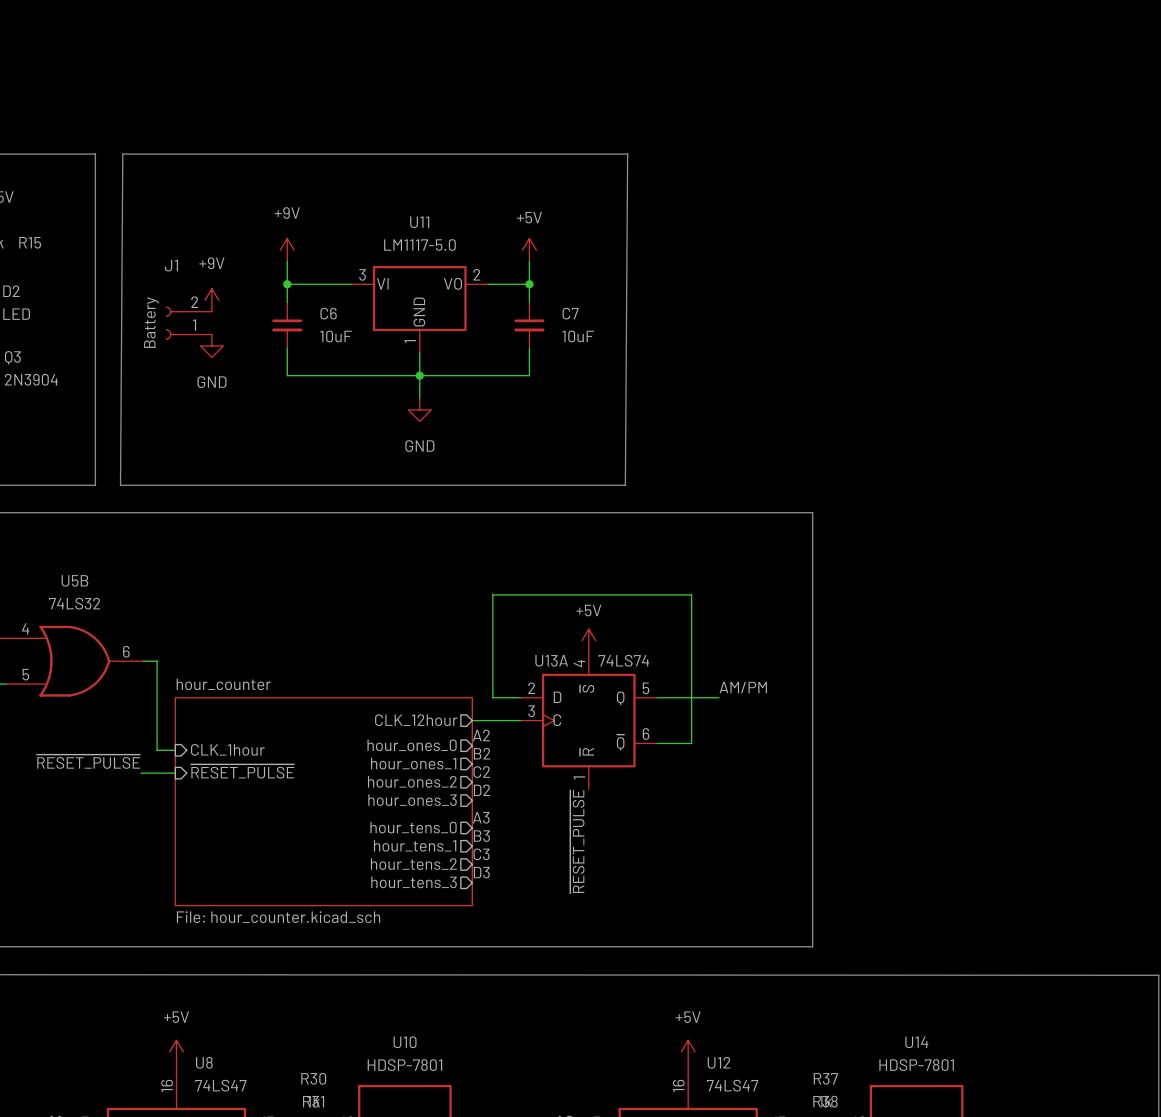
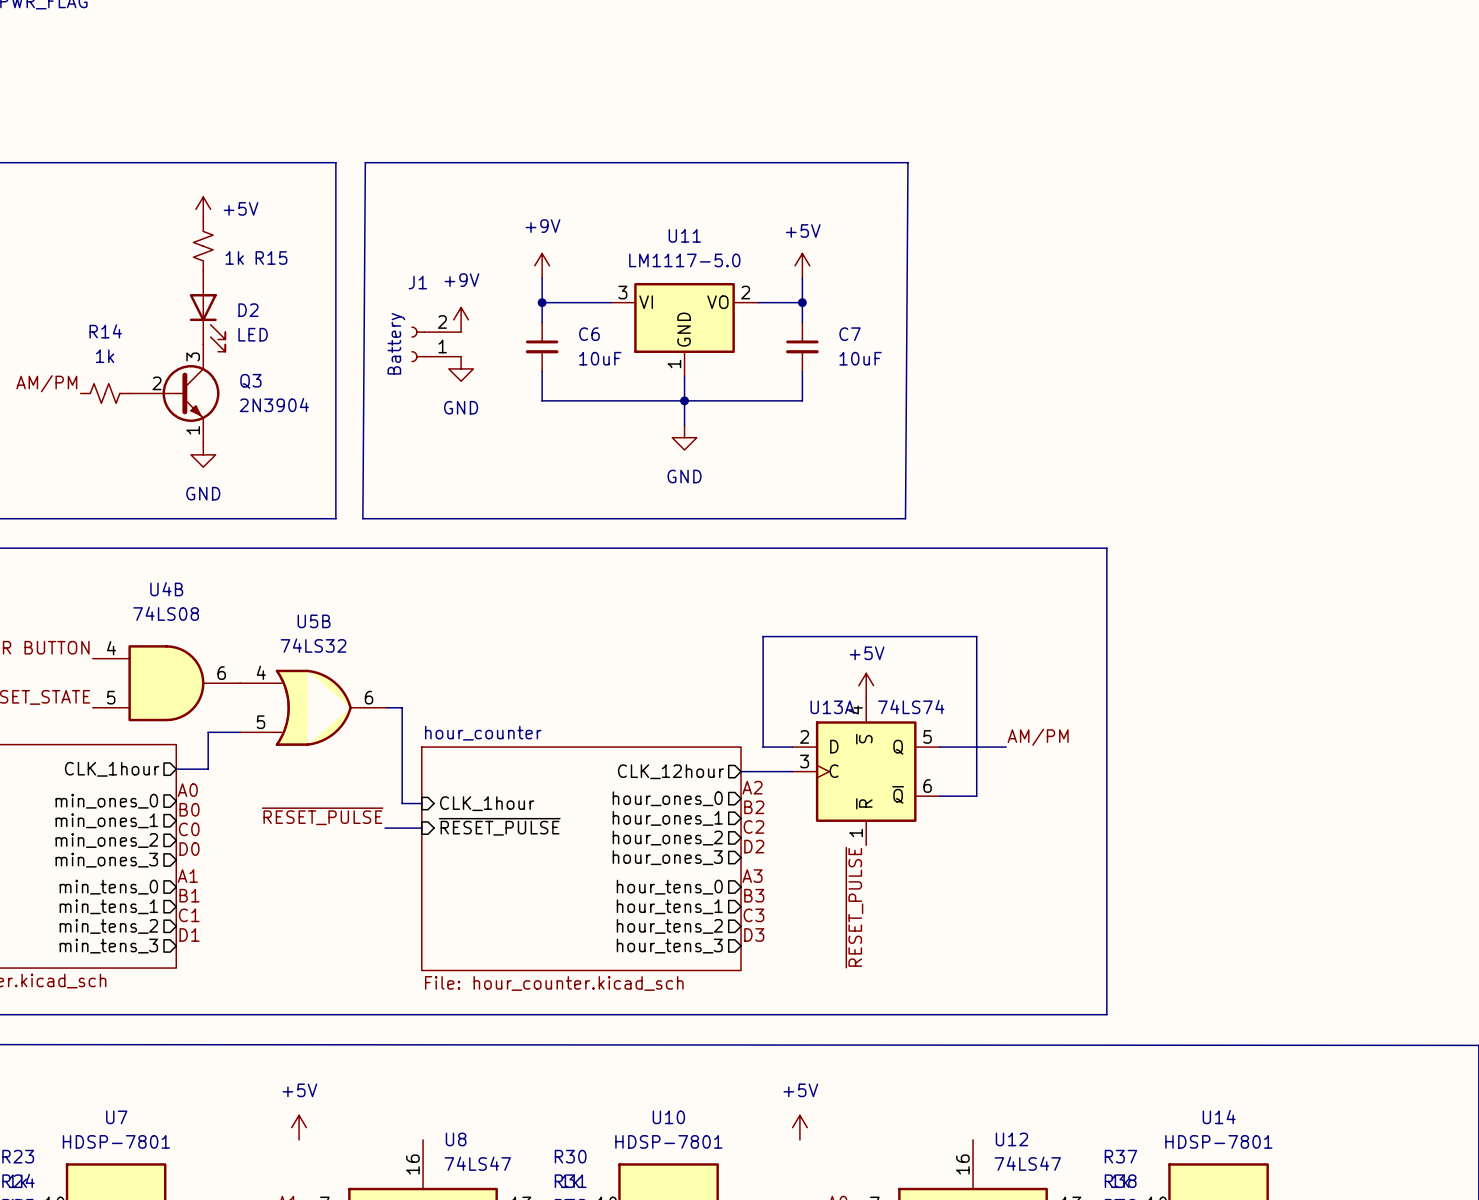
power symbol: none -> +5V (299, 1127)
power symbol: +5V (176, 1051) -> none
power symbol: none -> +5V (799, 1127)
power symbol: +5V (688, 1051) -> none

